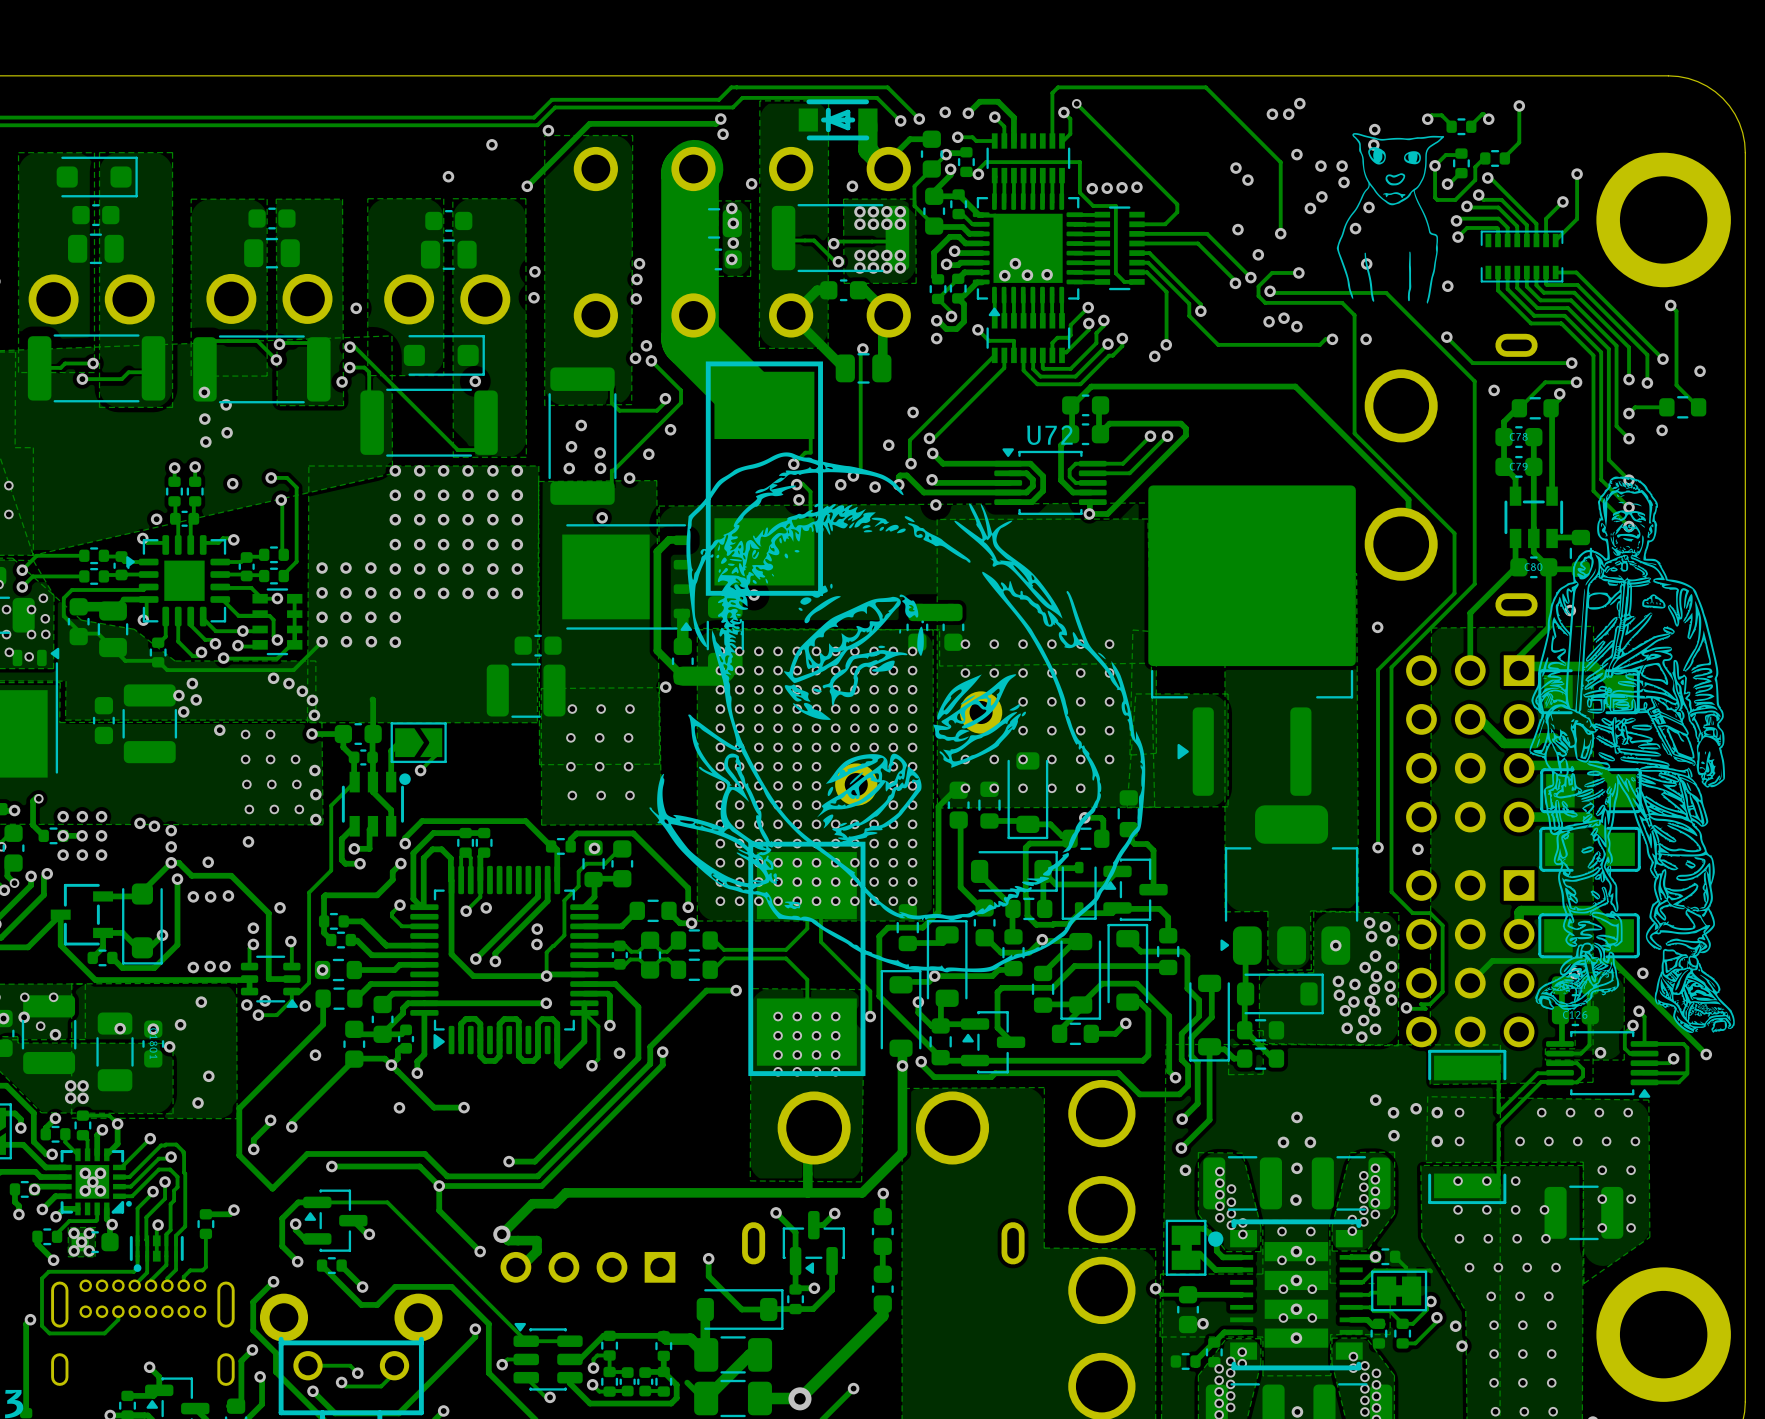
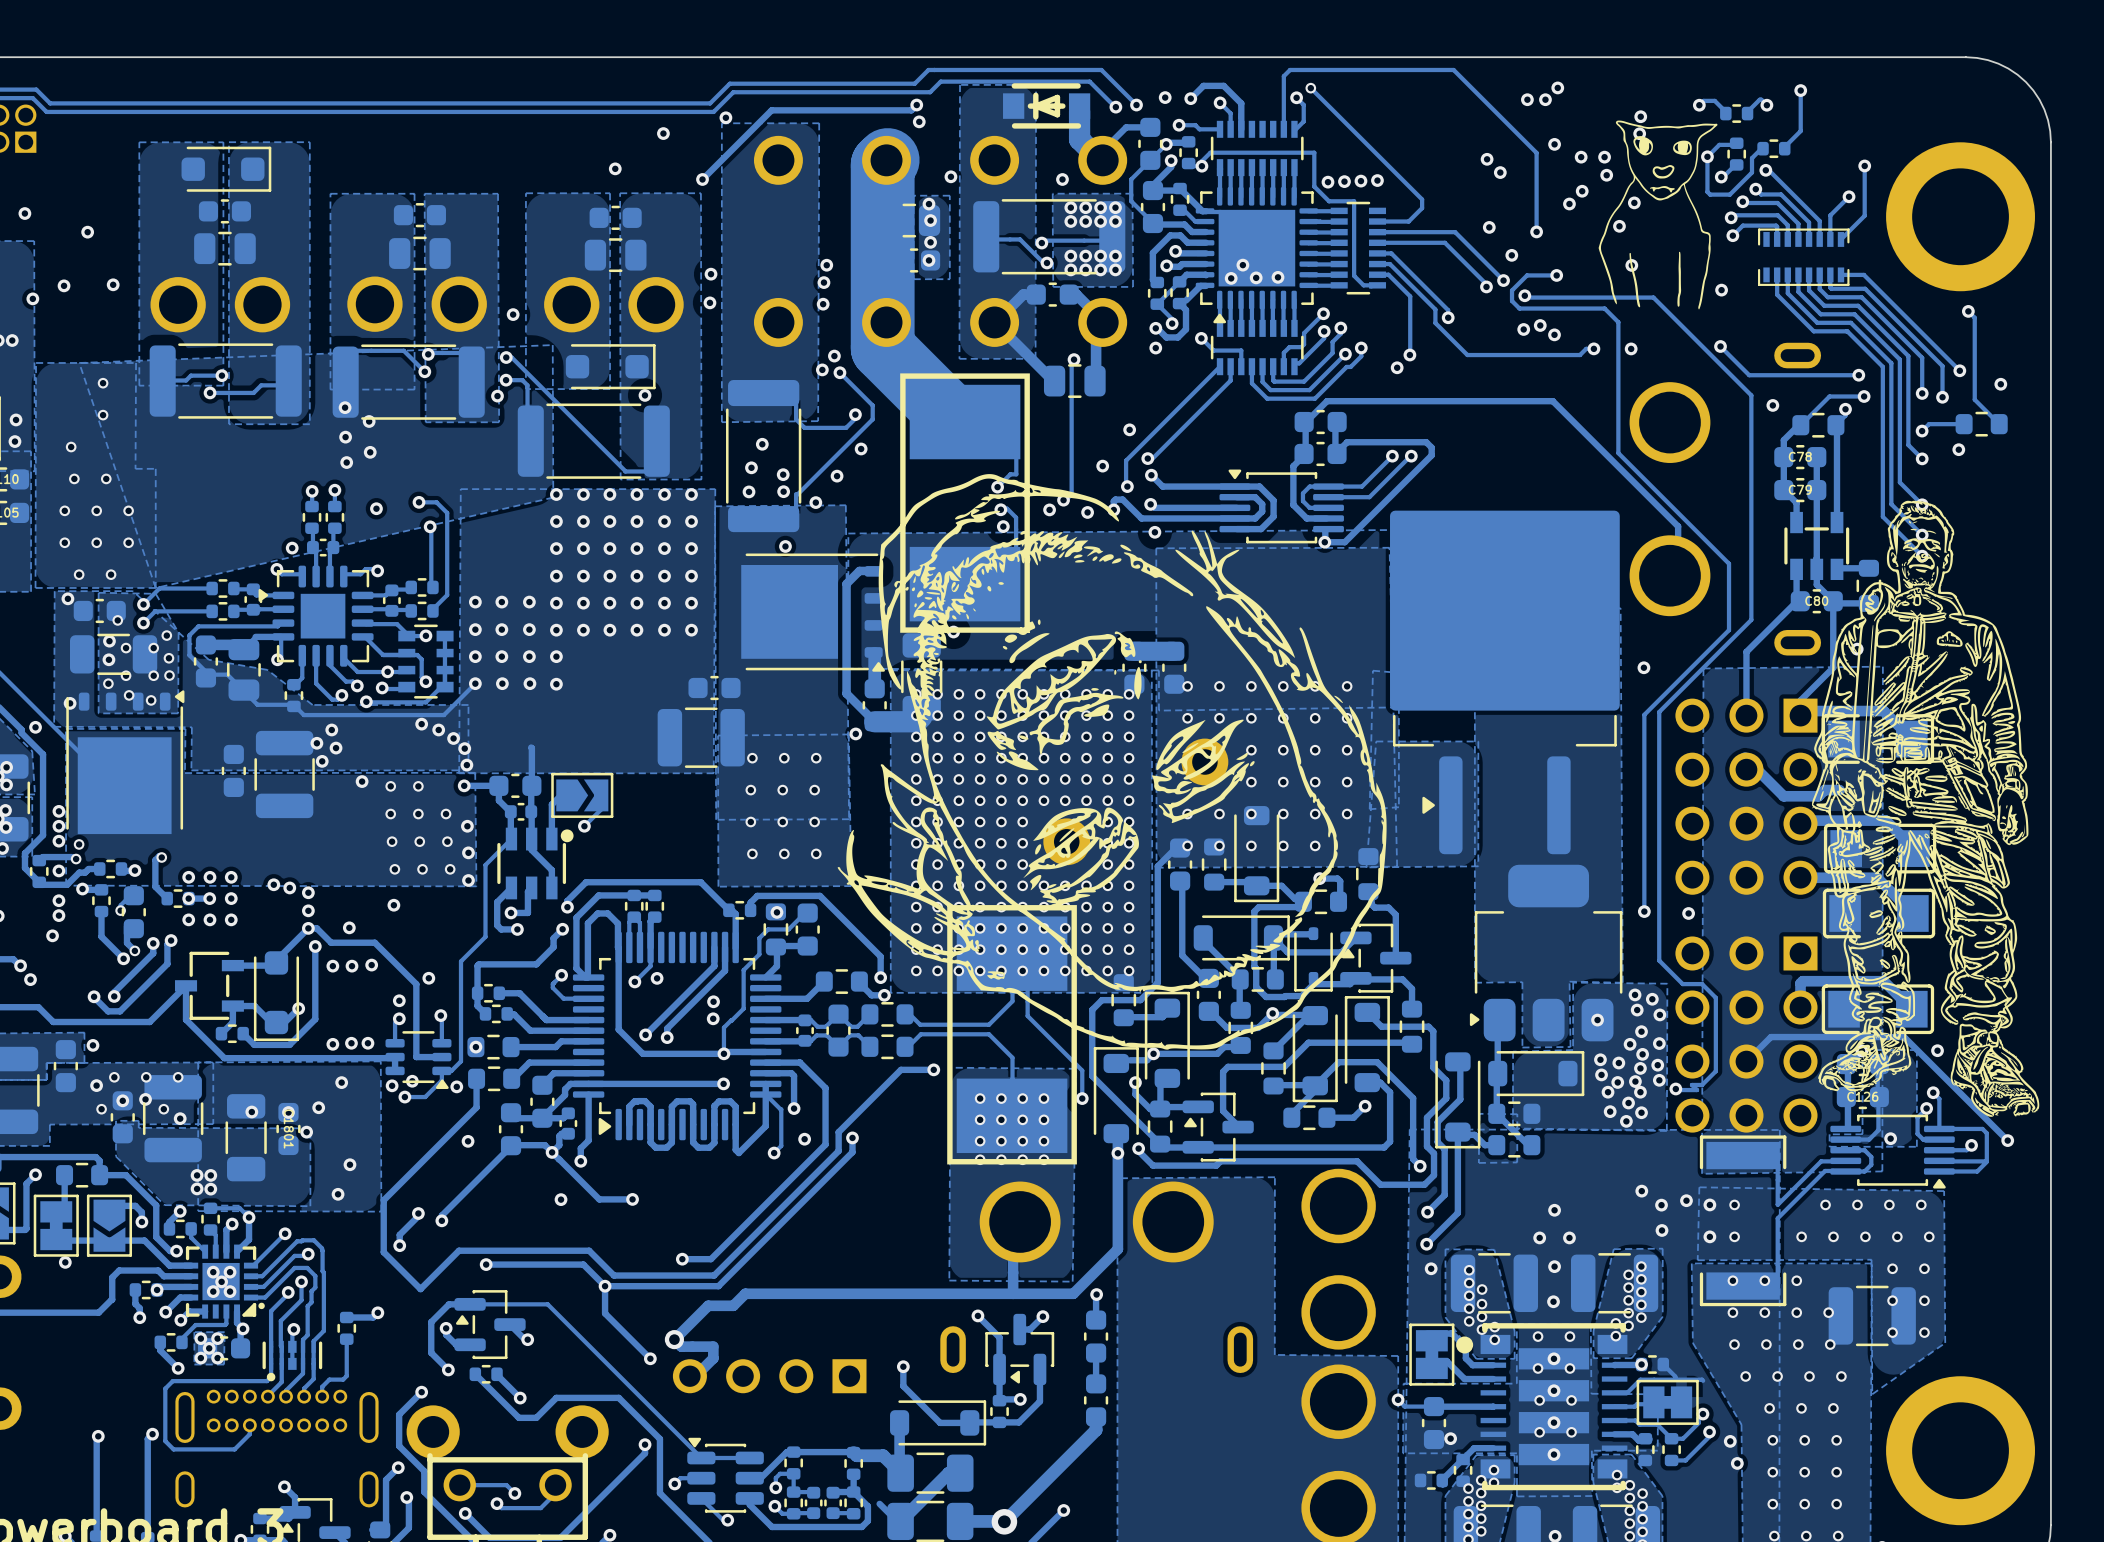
U72 name: U72 (1049, 435) -> none

